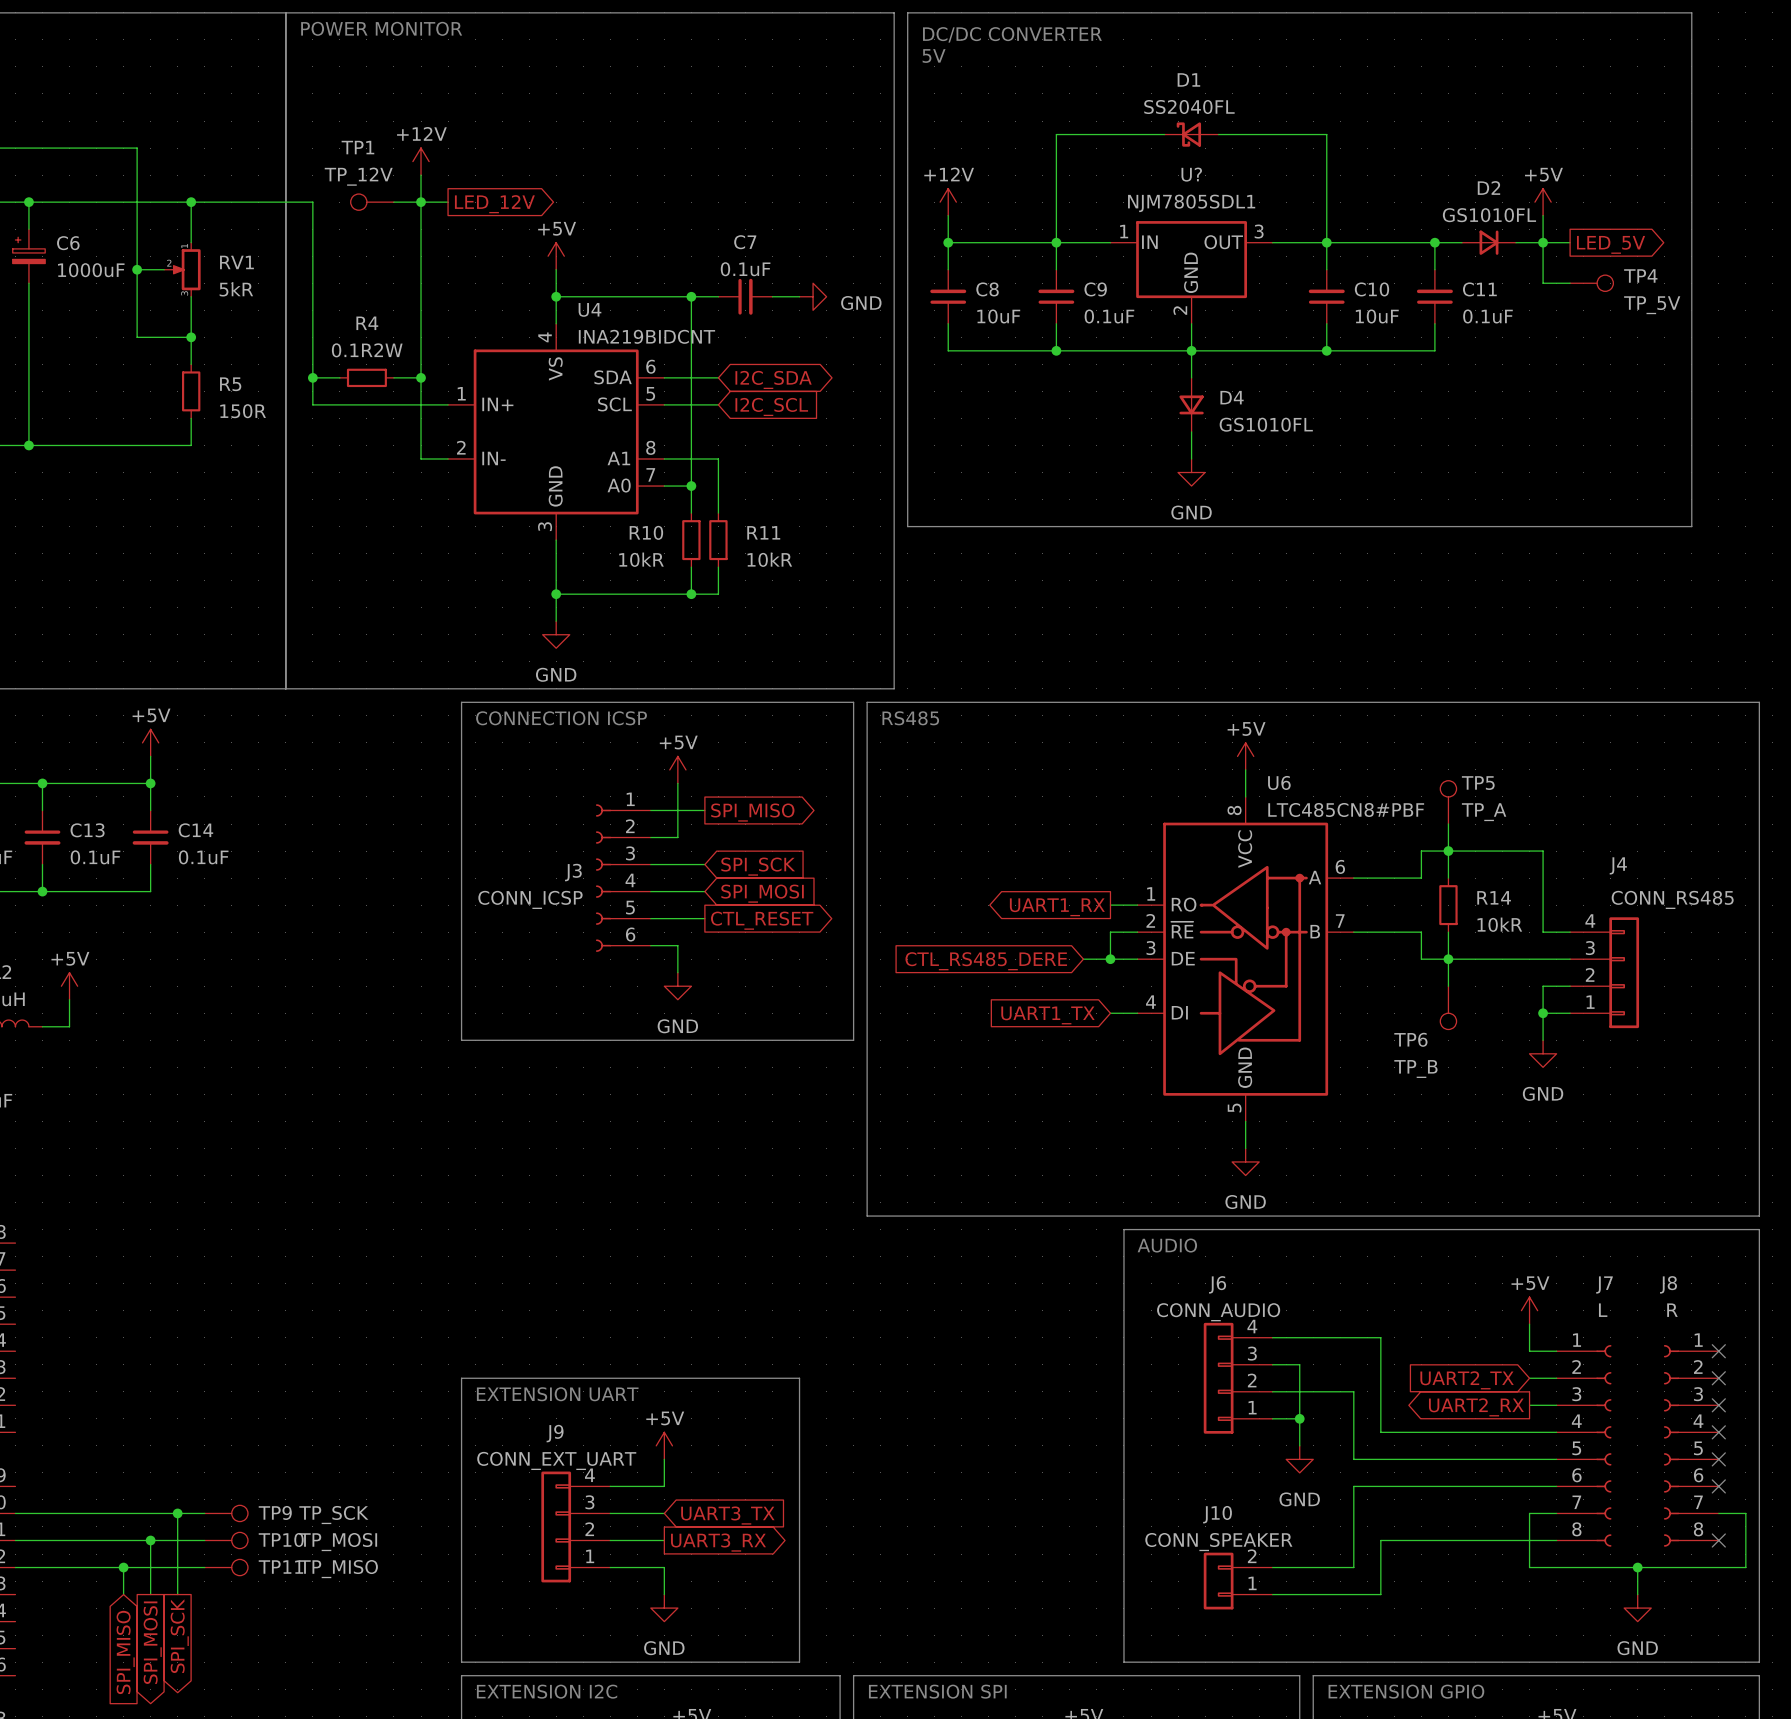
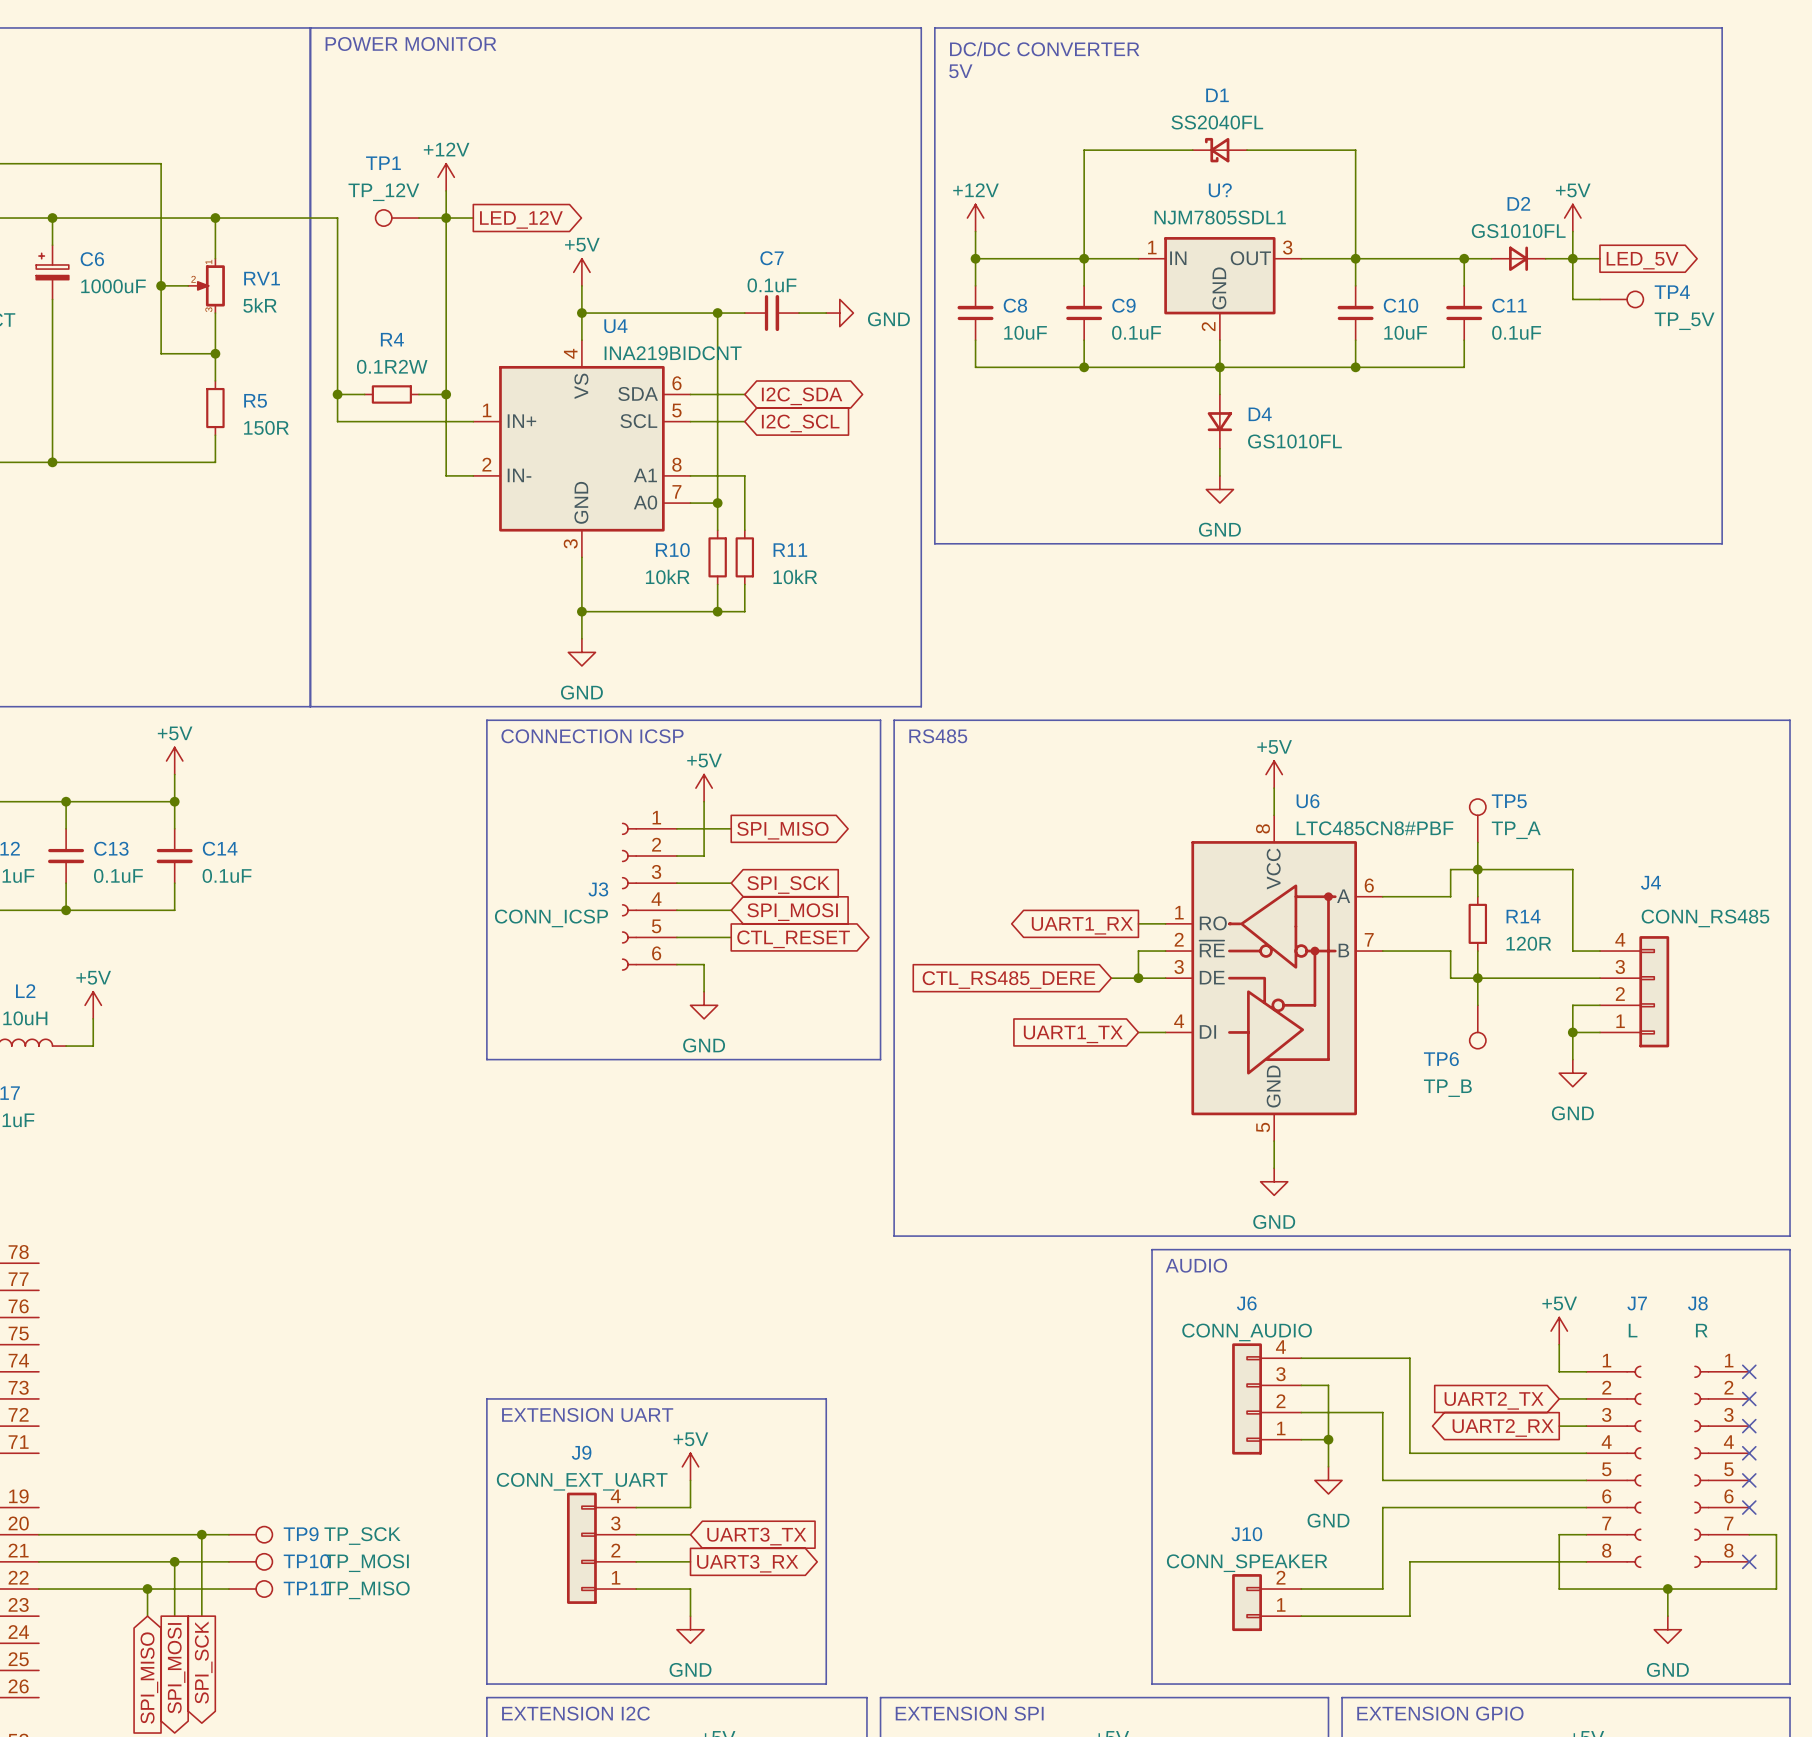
R14 value: 10kR (1499, 924) -> 120R (1528, 943)

